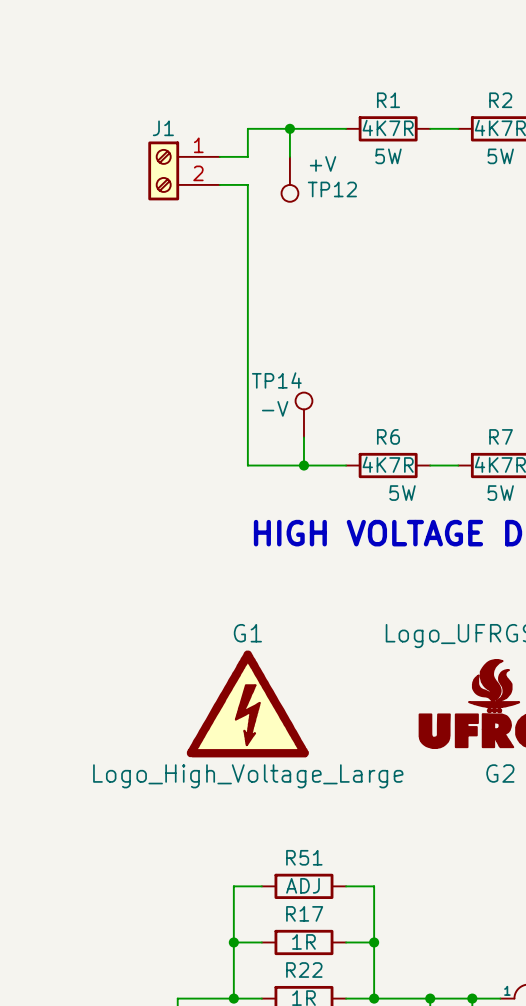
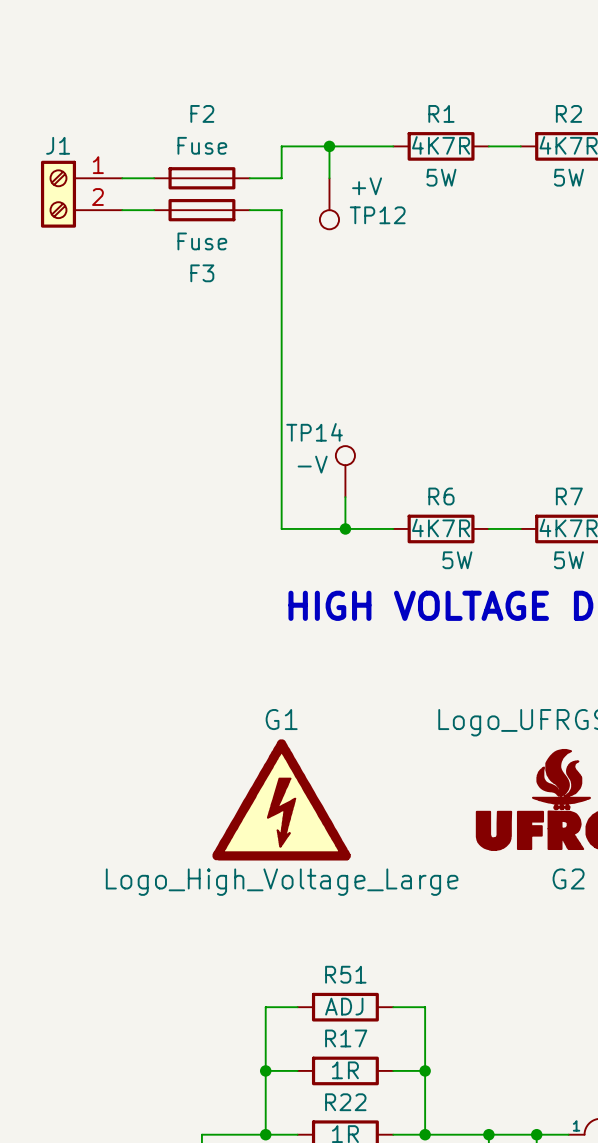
wire: none -> (122, 178) (154, 178)
F2: none -> Fuse (201, 178)
J1 position: (184, 170) -> (81, 194)
wire: none -> (122, 210) (154, 210)
F3: none -> Fuse (201, 210)

